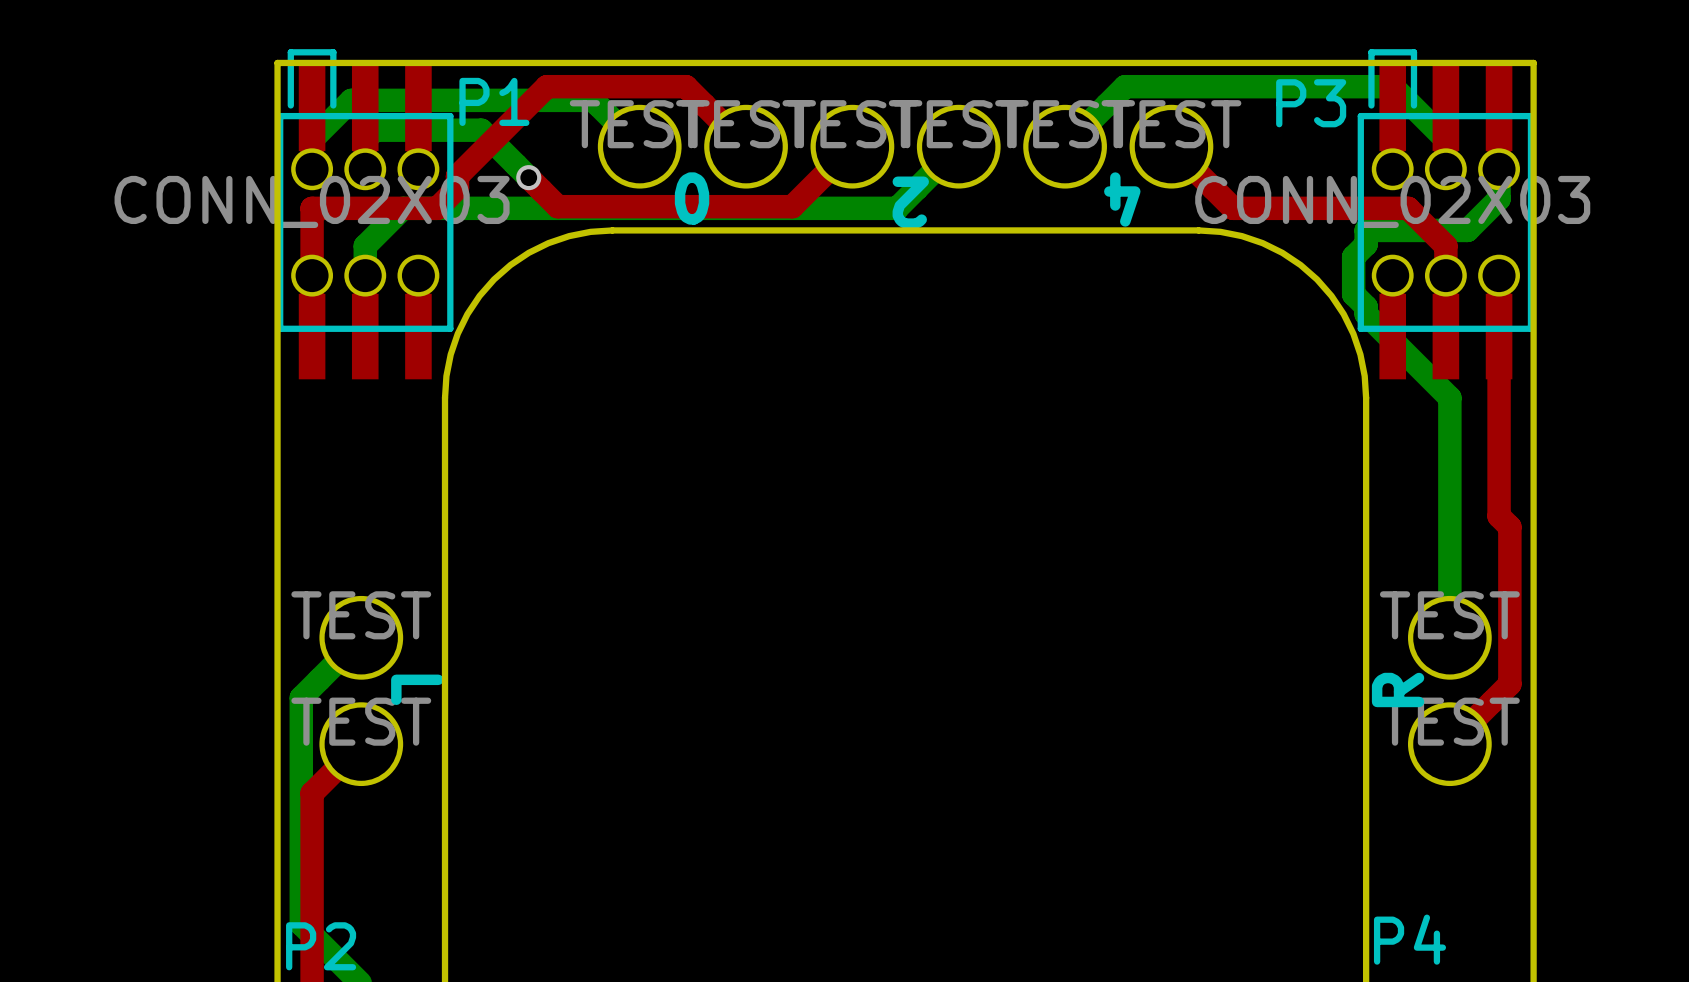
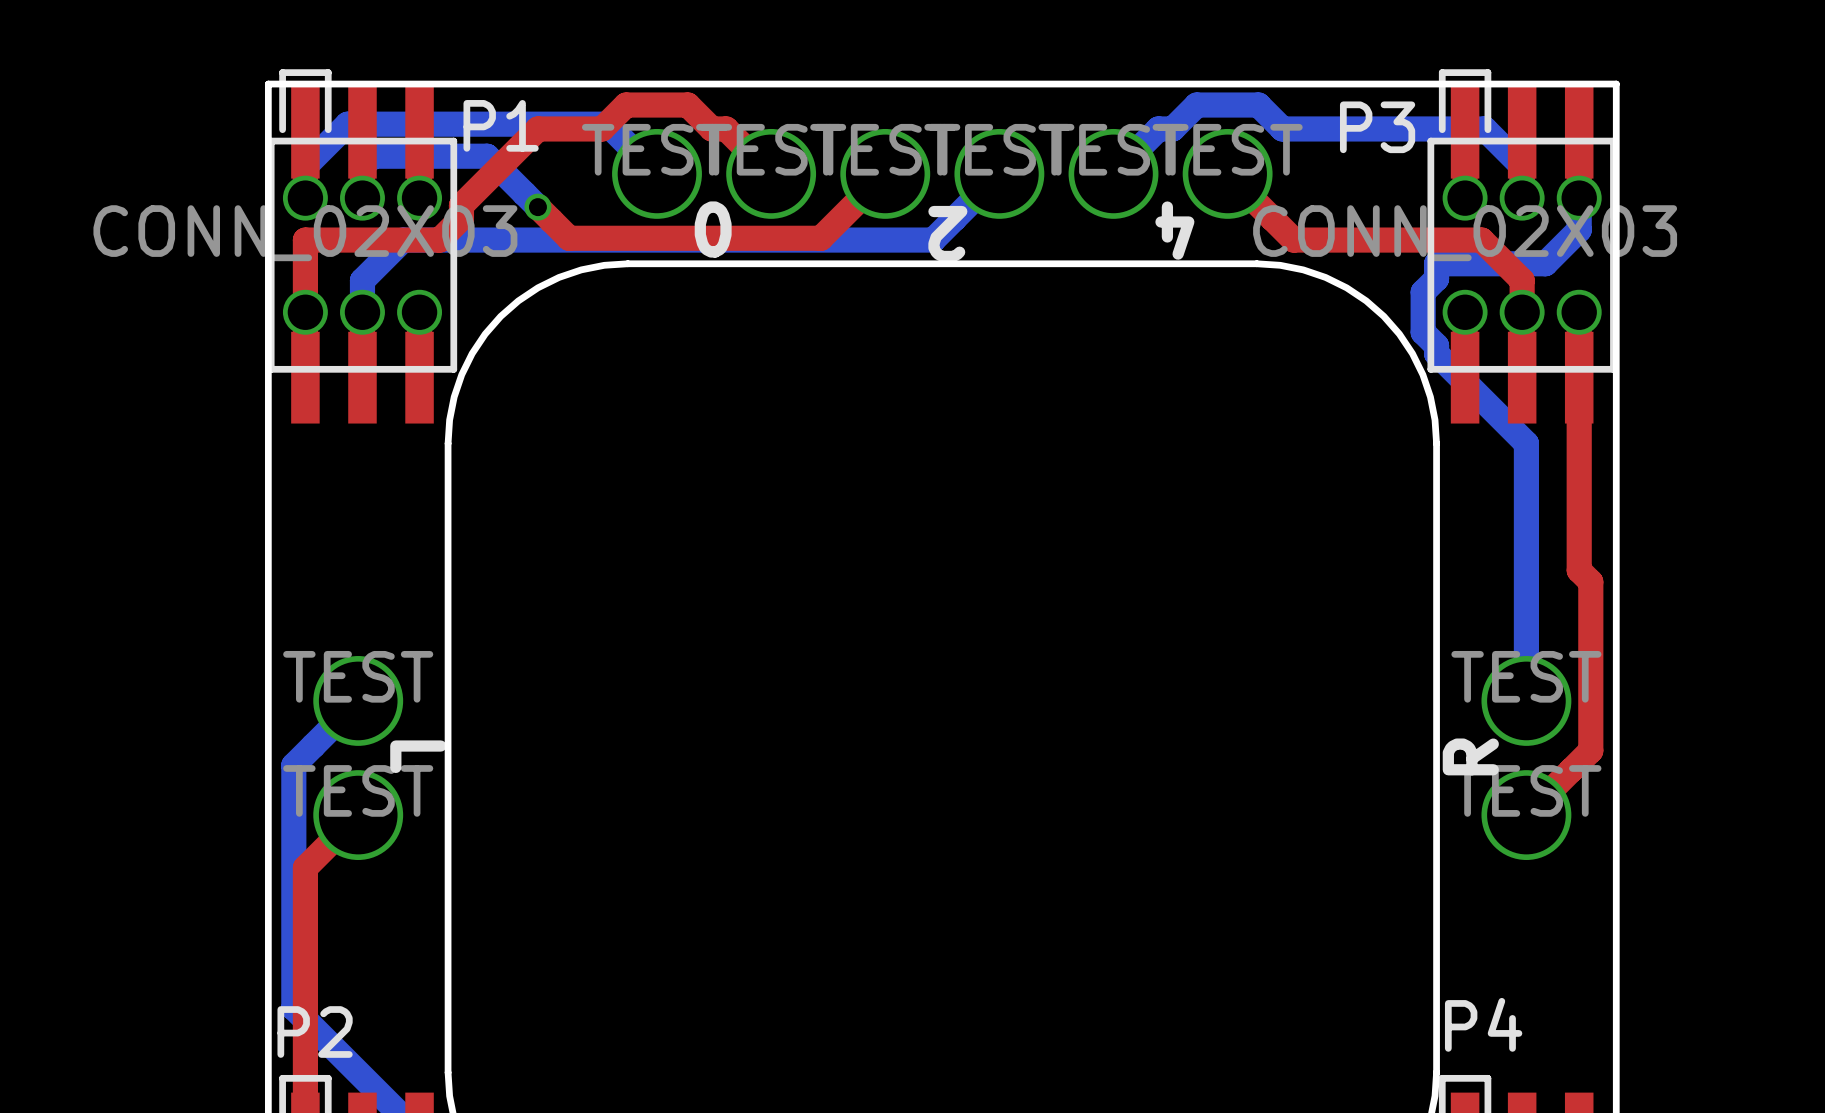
top track: (528, 104) (546, 86) (686, 86) (704, 104) -> (537, 128) (602, 128) (626, 105) (687, 105) (711, 128) (726, 128)
bottom track: (1106, 104) (1125, 86) (1392, 86) (1411, 104) -> (1158, 128) (1172, 128) (1196, 105) (1258, 105) (1282, 128) (1484, 128)

